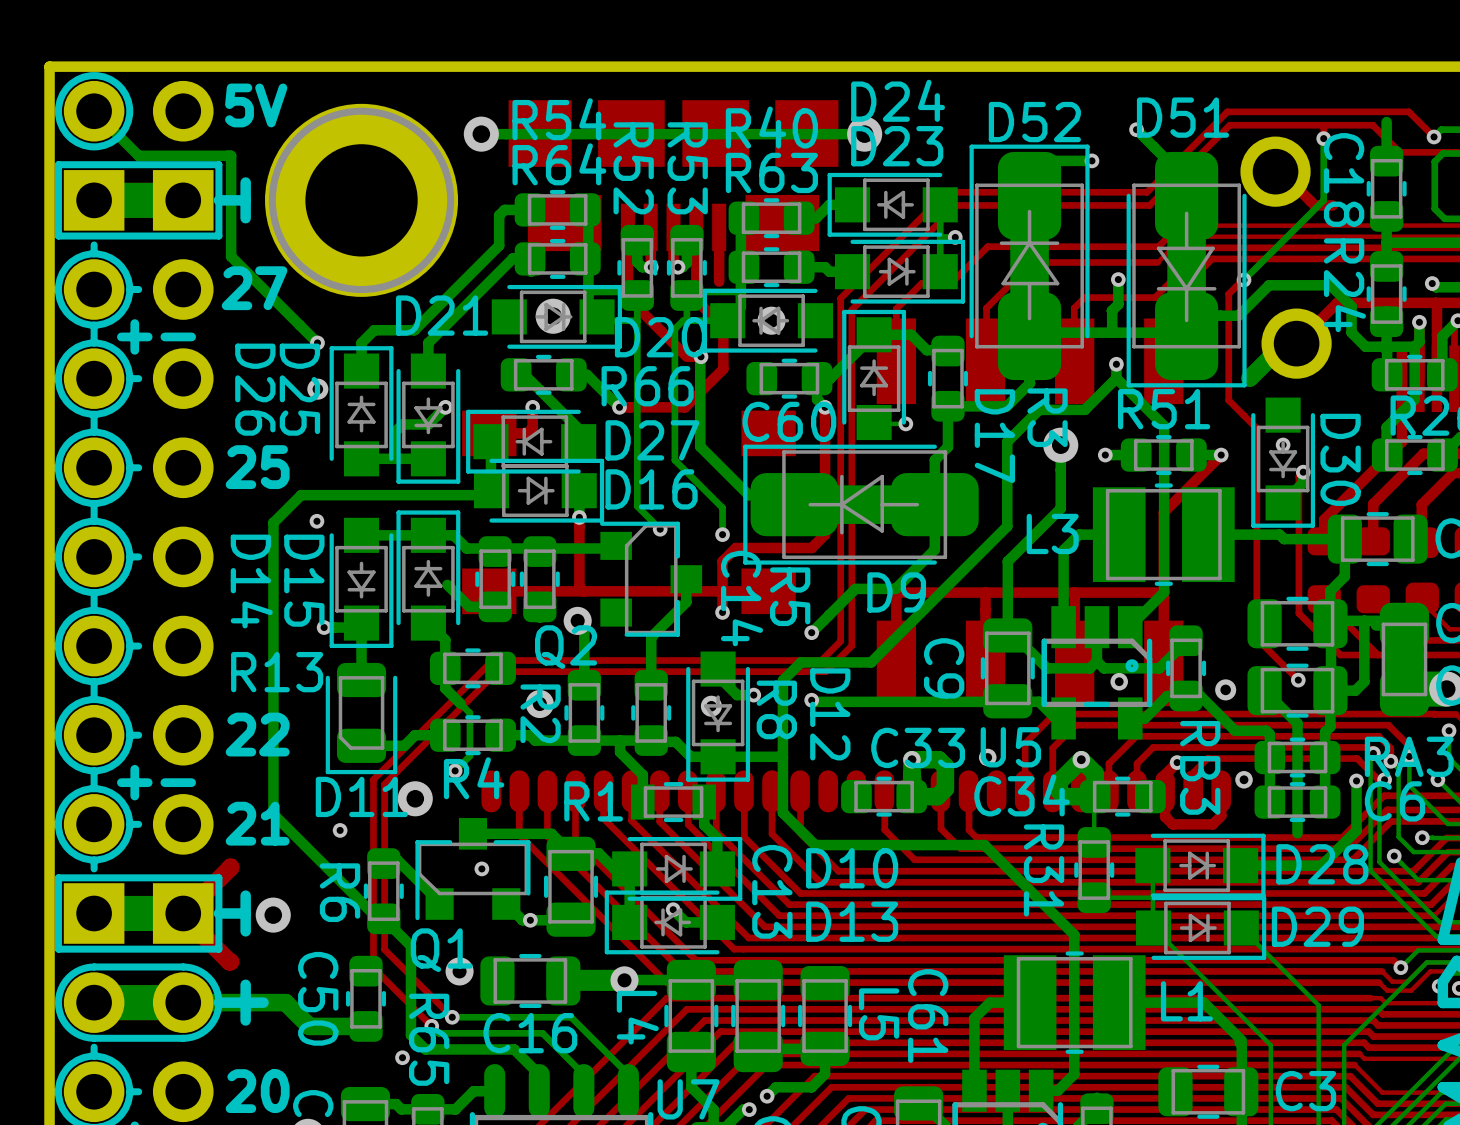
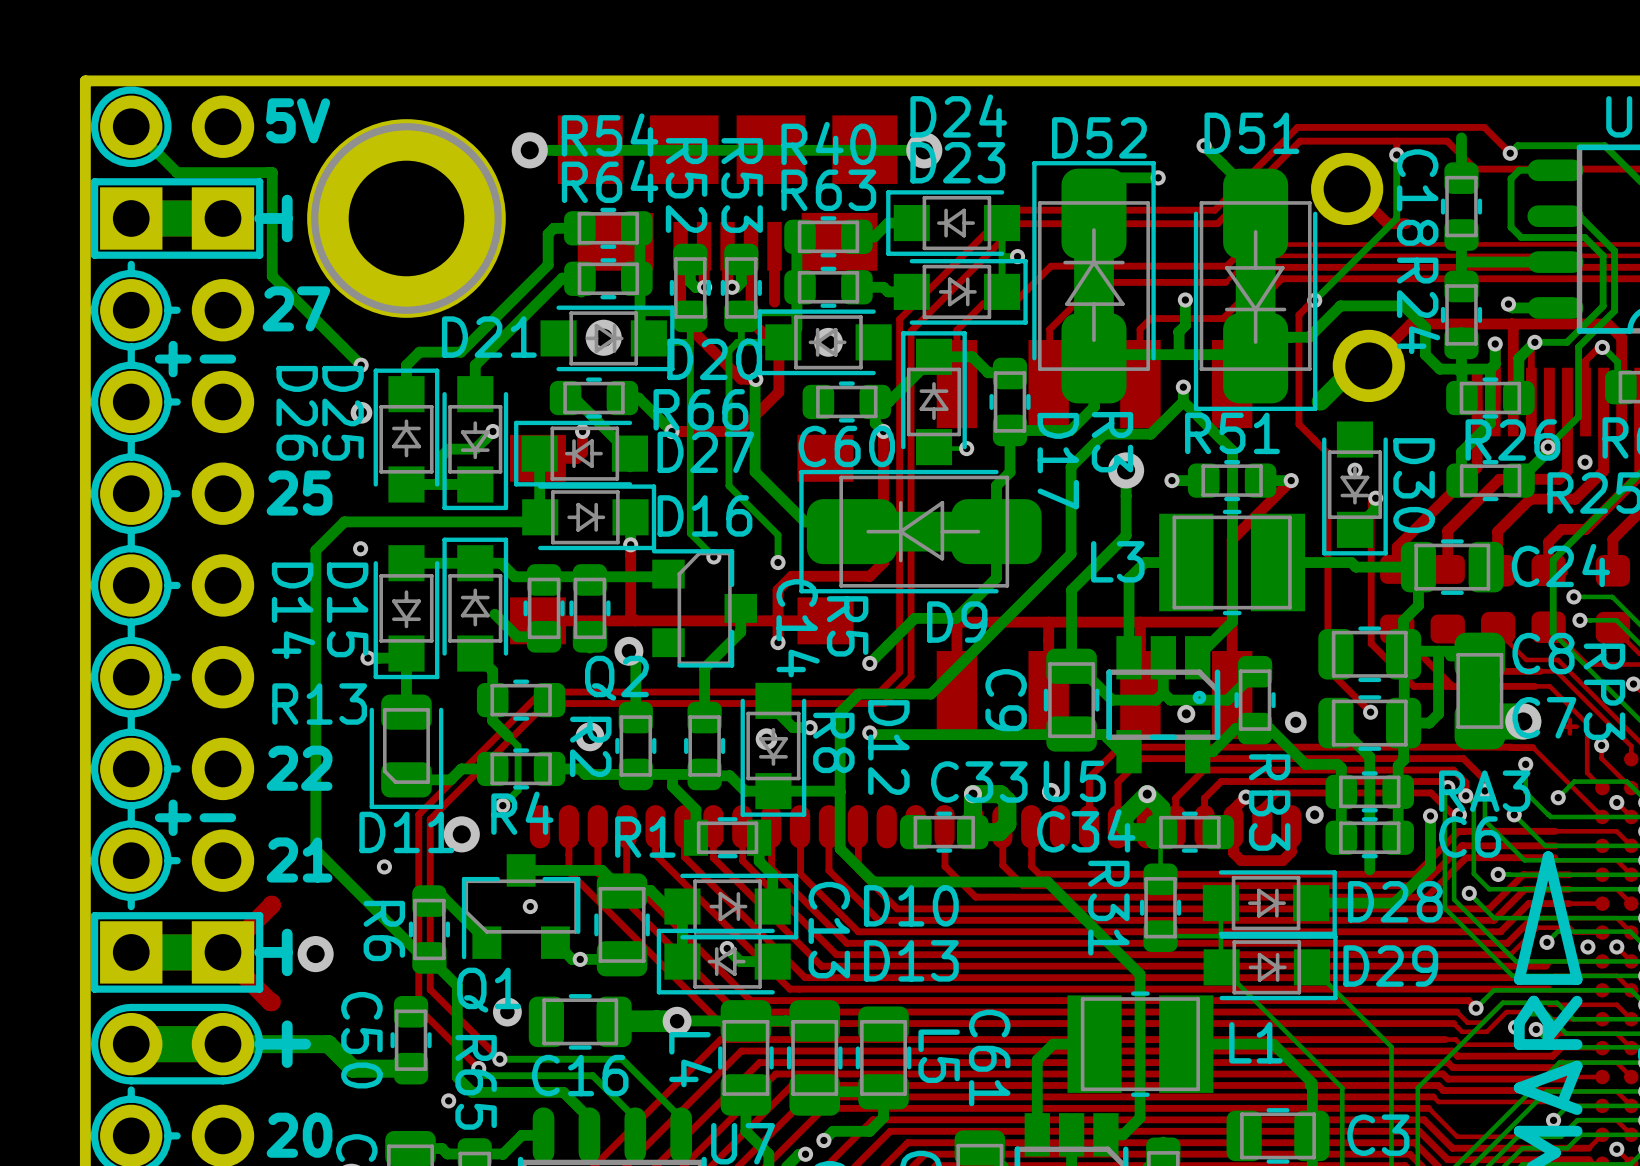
D27 position: (531, 441) -> (581, 453)

